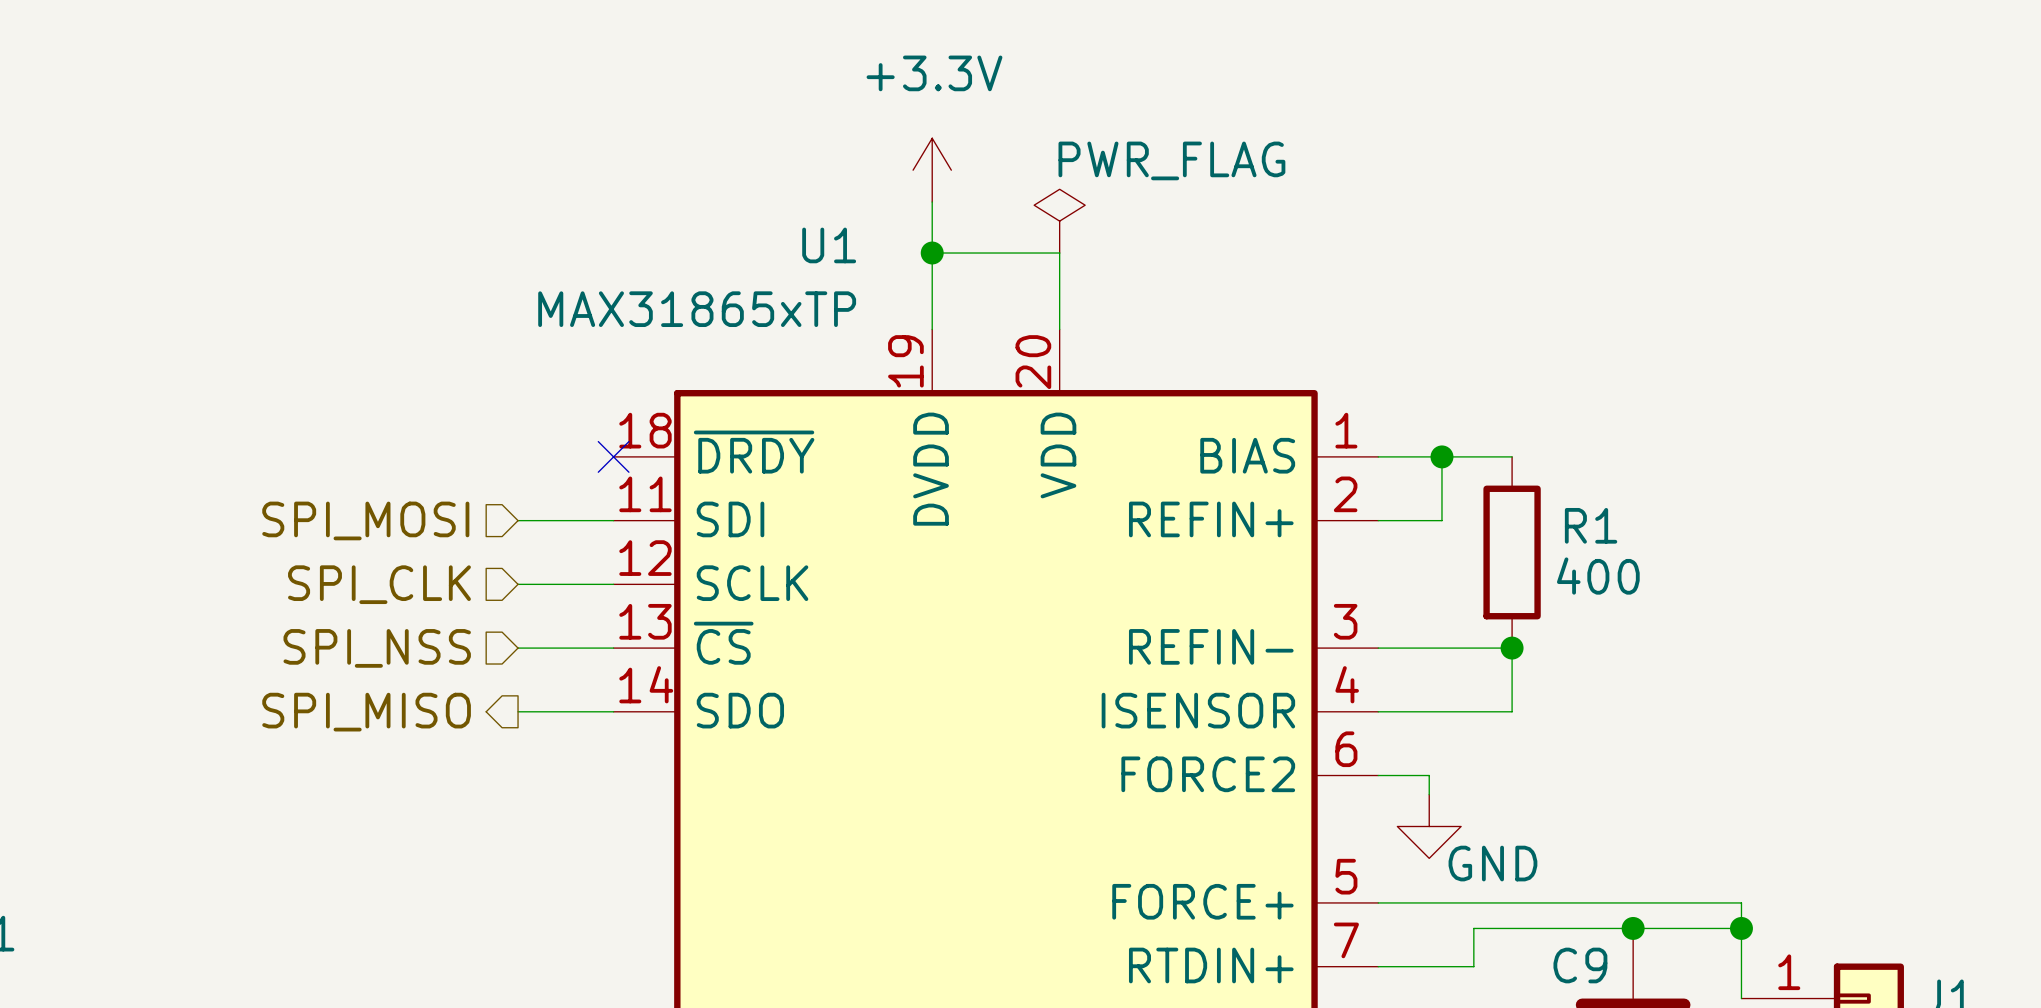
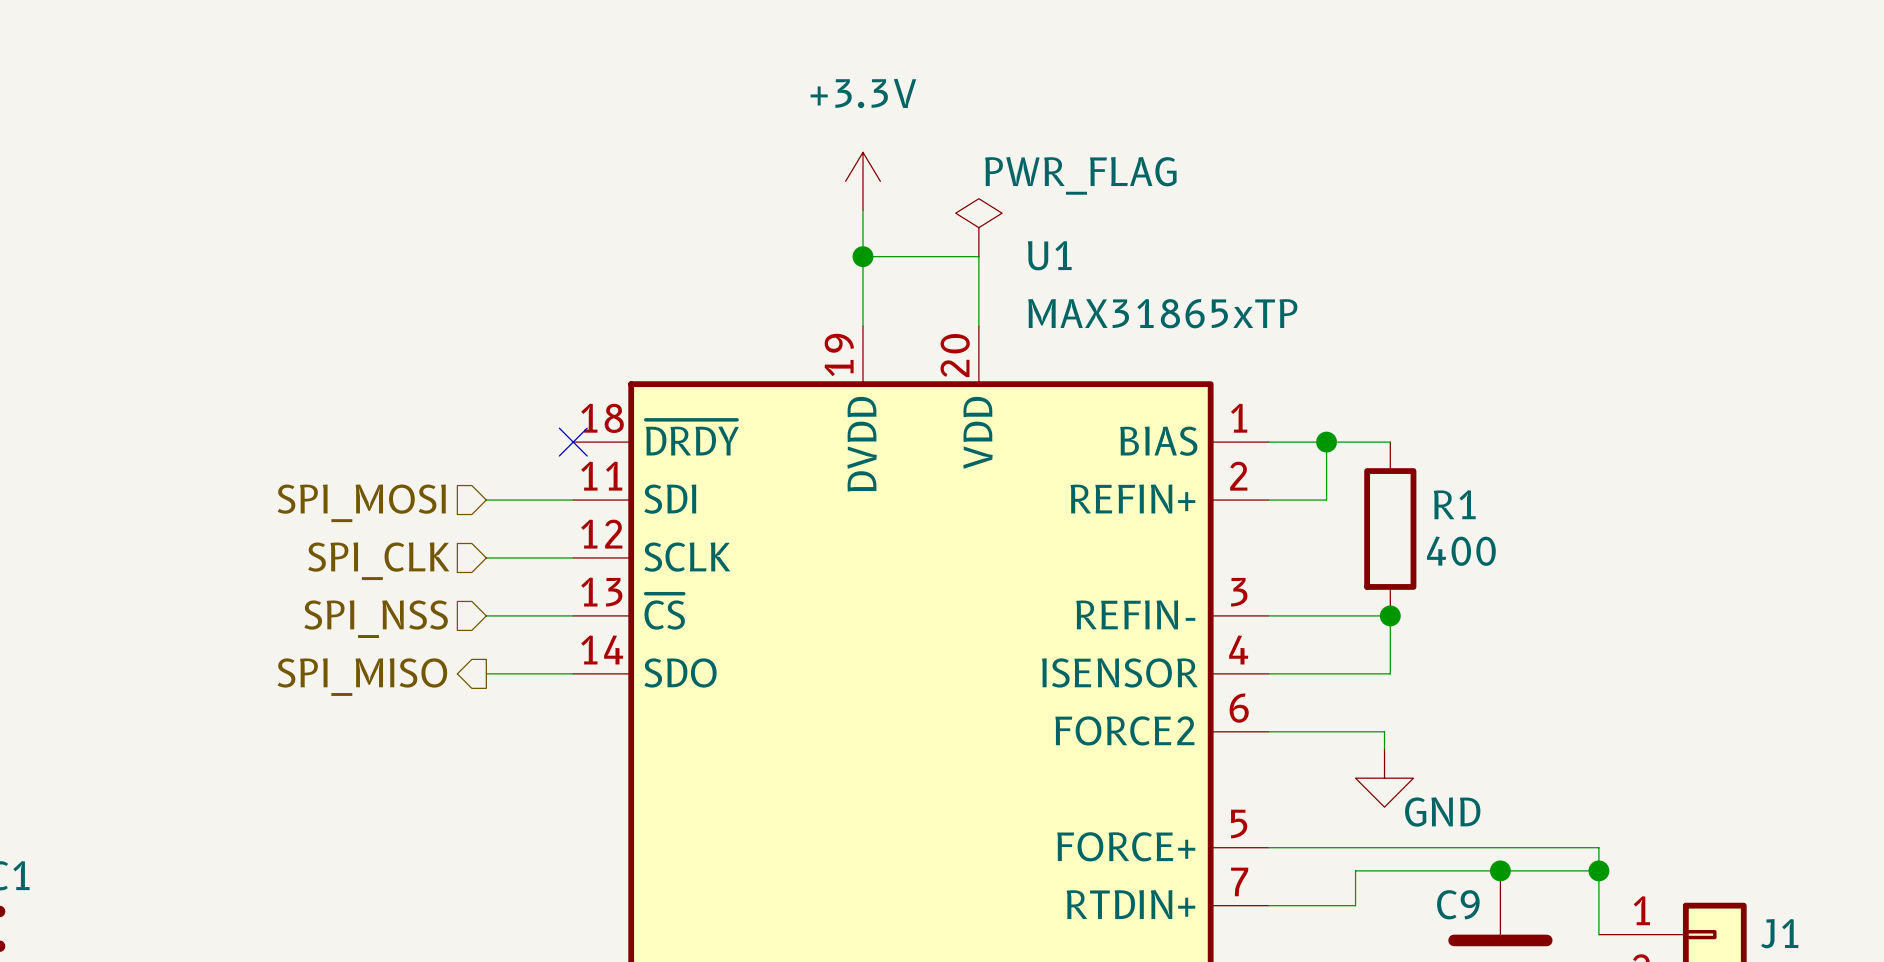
U1 name position: U1 (829, 245) -> U1 (1049, 255)
U1 value position: MAX31865xTP (697, 309) -> MAX31865xTP (1162, 313)
wire: (1429, 775) (1429, 794) -> (1314, 731) (1384, 731) (1384, 749)
power symbol position: GND (1429, 826) -> GND (1384, 778)

